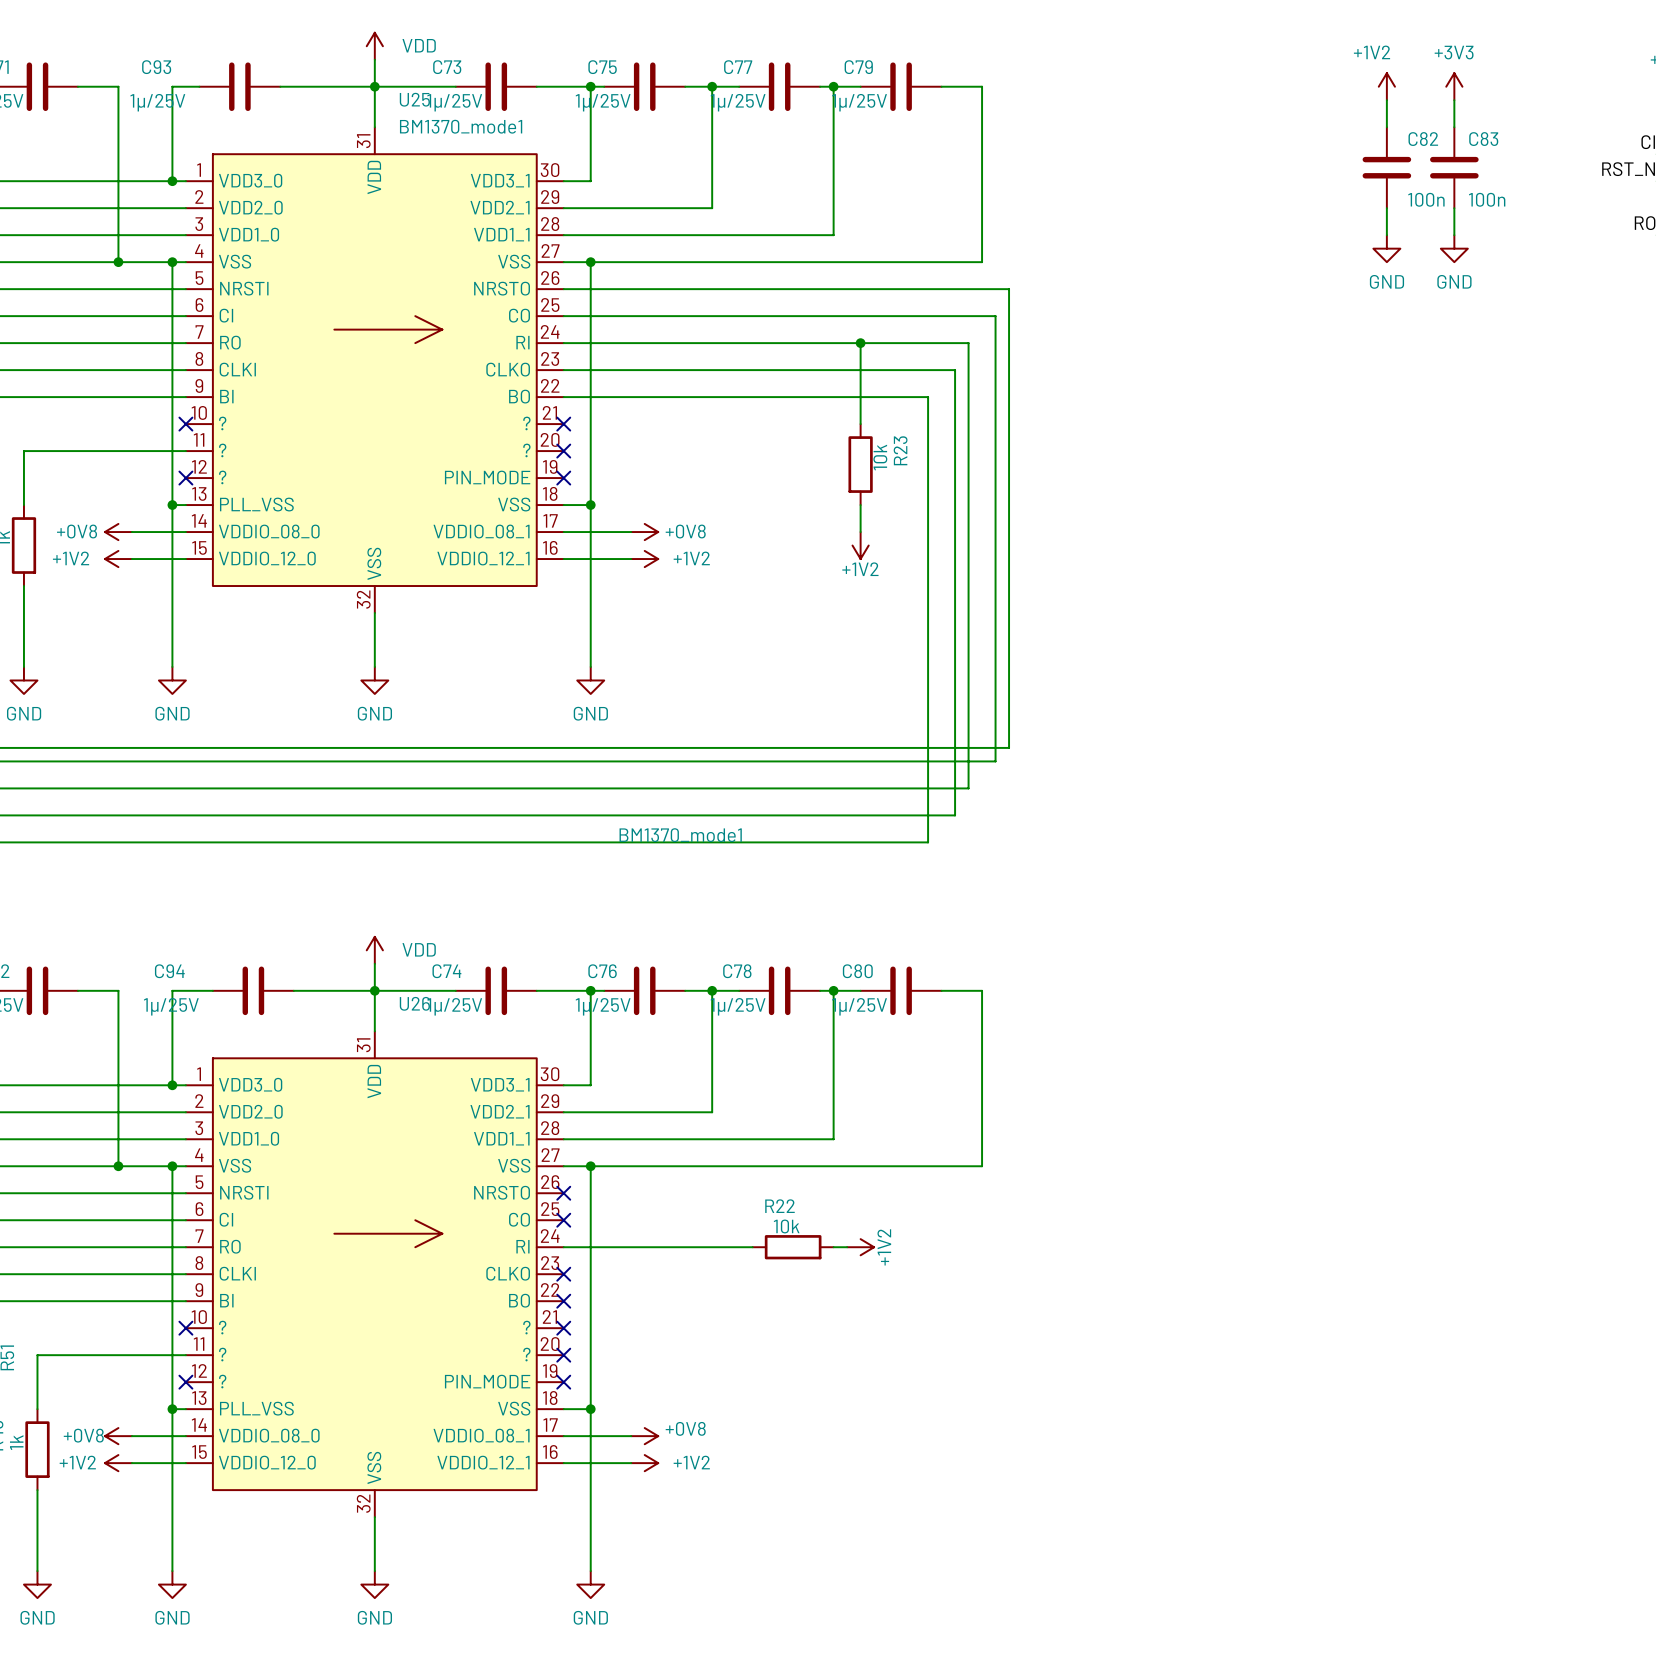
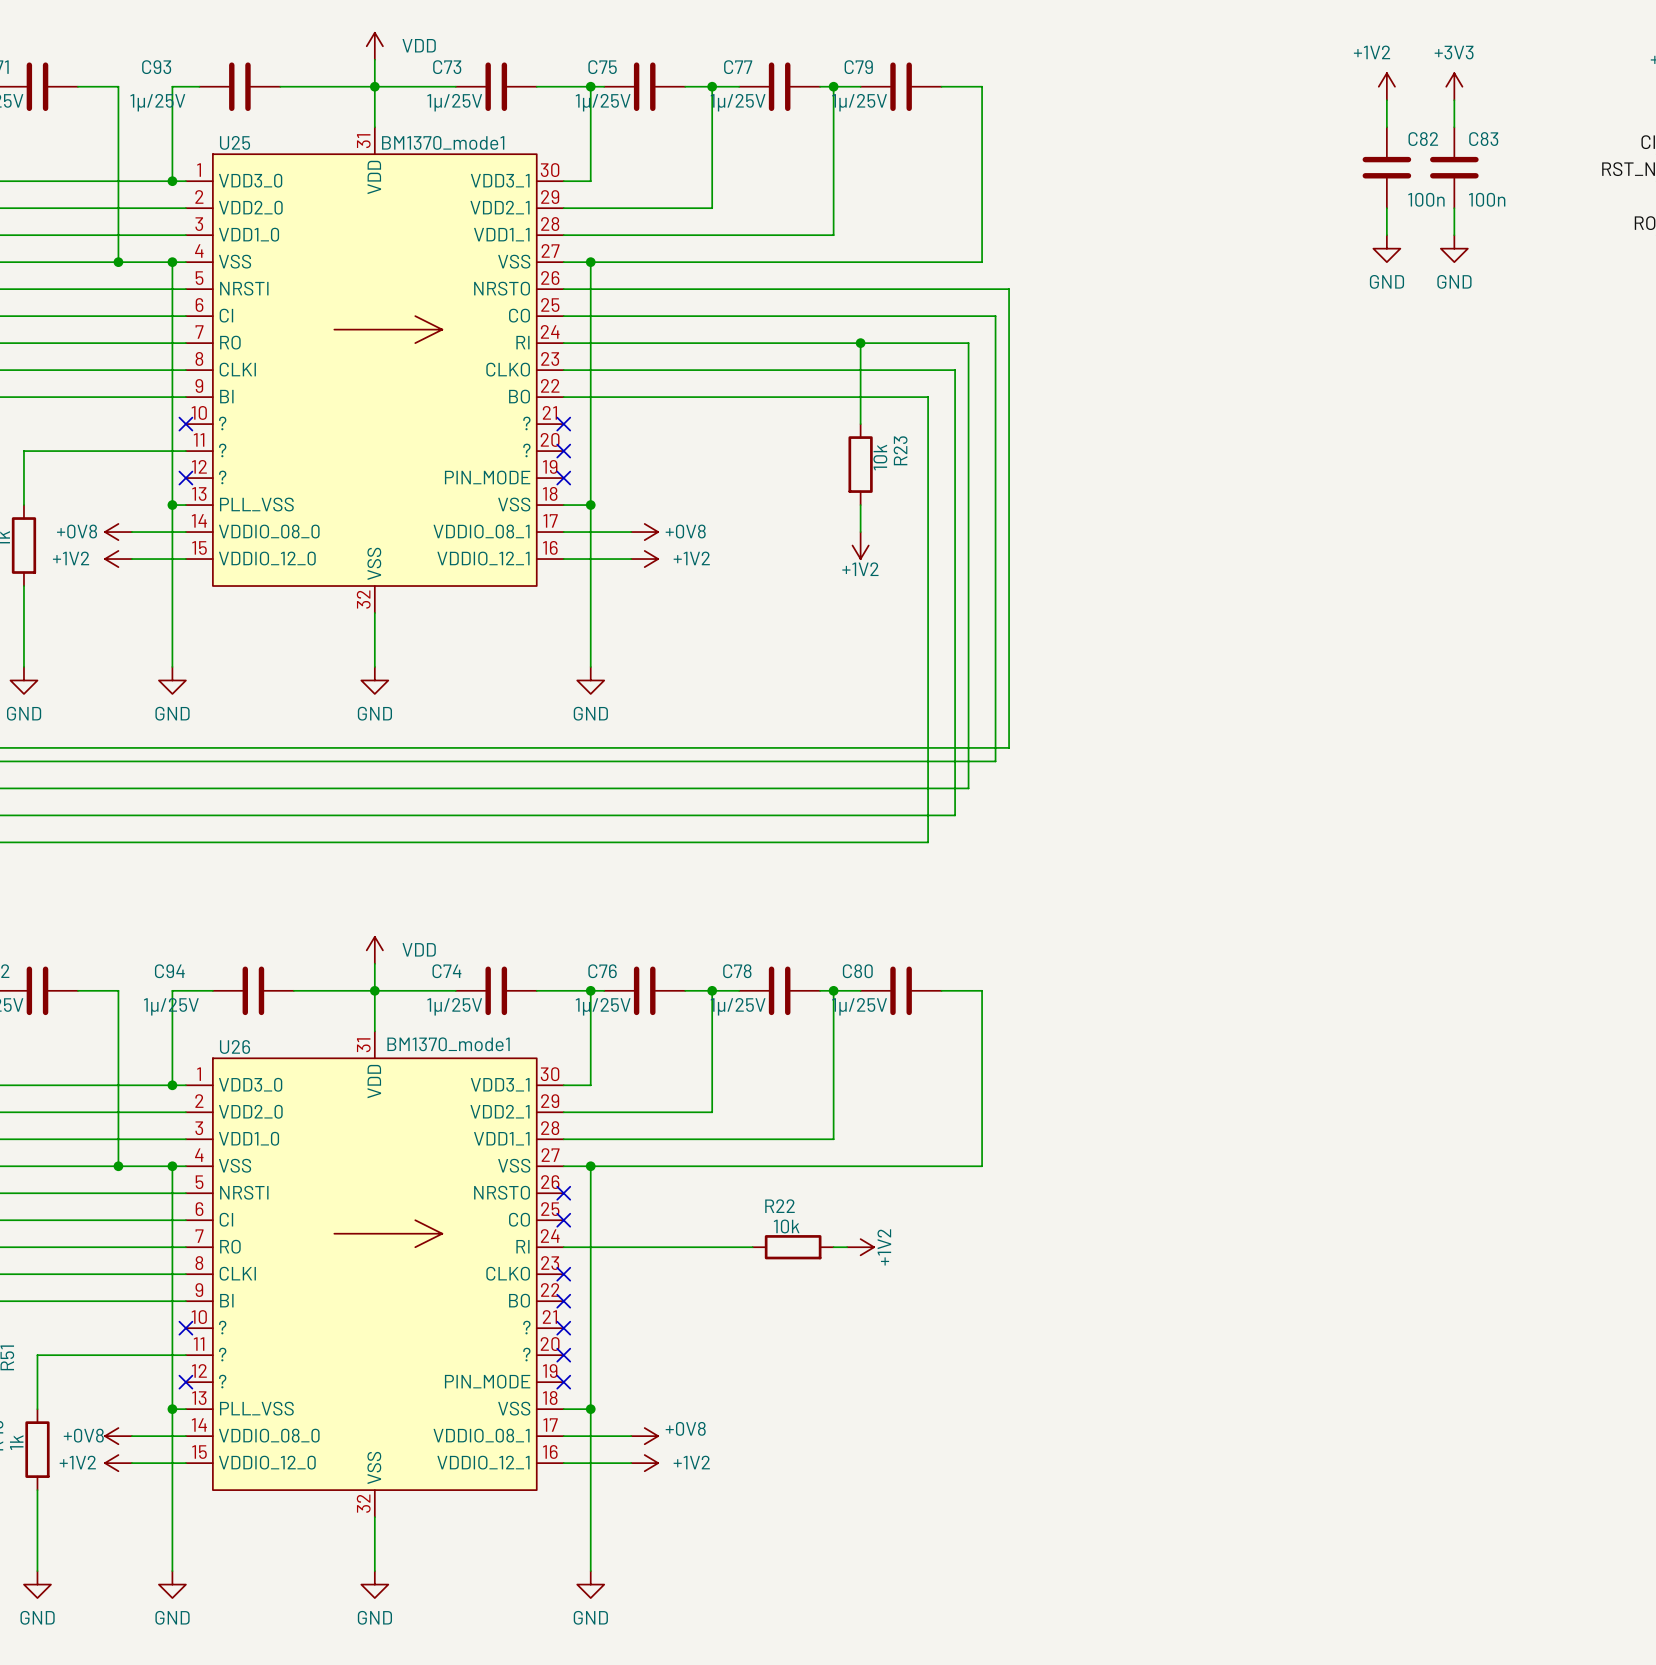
U25 name position: U25 (414, 99) -> U25 (235, 142)
U25 value position: BM1370_mode1 (461, 126) -> BM1370_mode1 (443, 142)
U26 value position: BM1370_mode1 (680, 835) -> BM1370_mode1 (448, 1044)
U26 name position: U26 (414, 1003) -> U26 (235, 1047)

